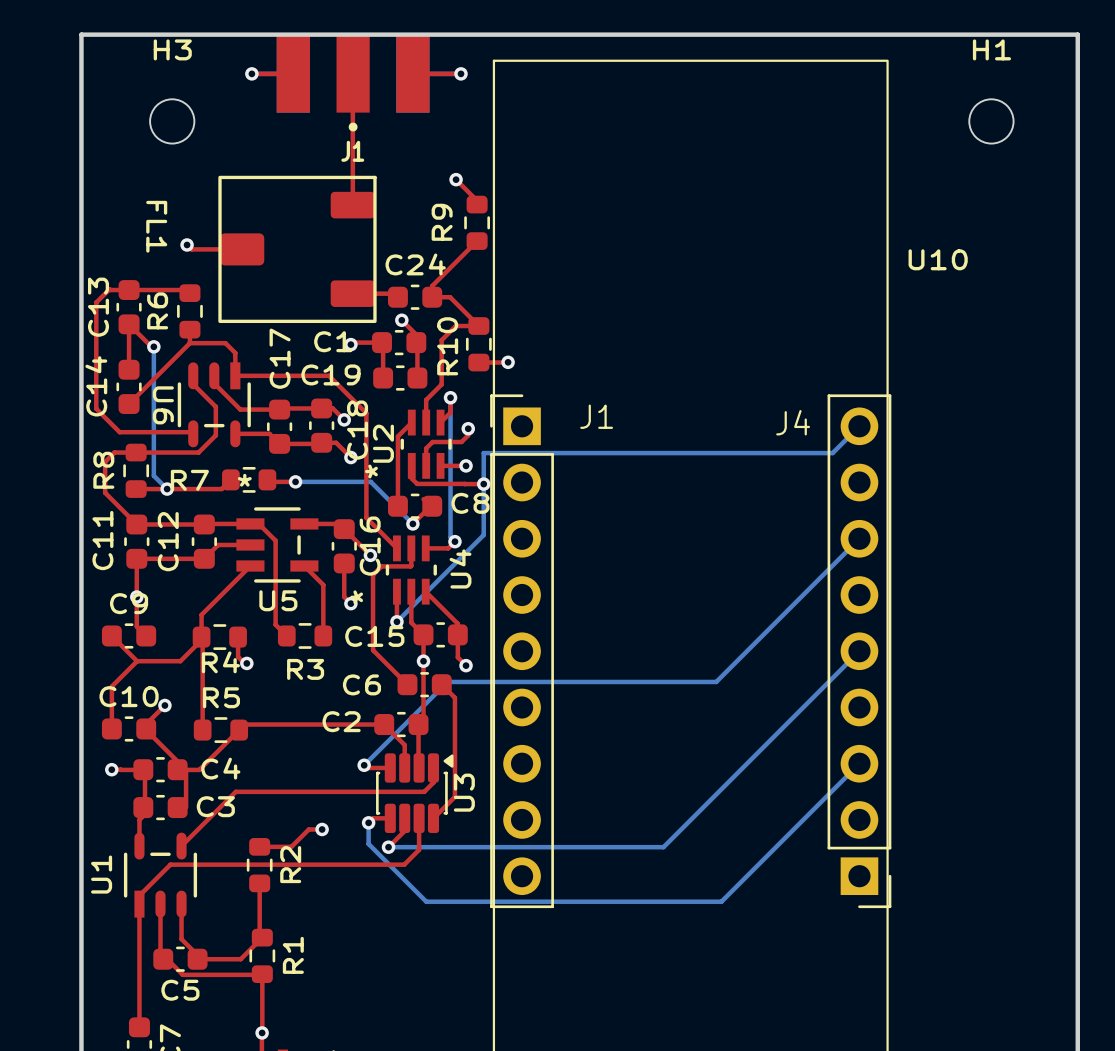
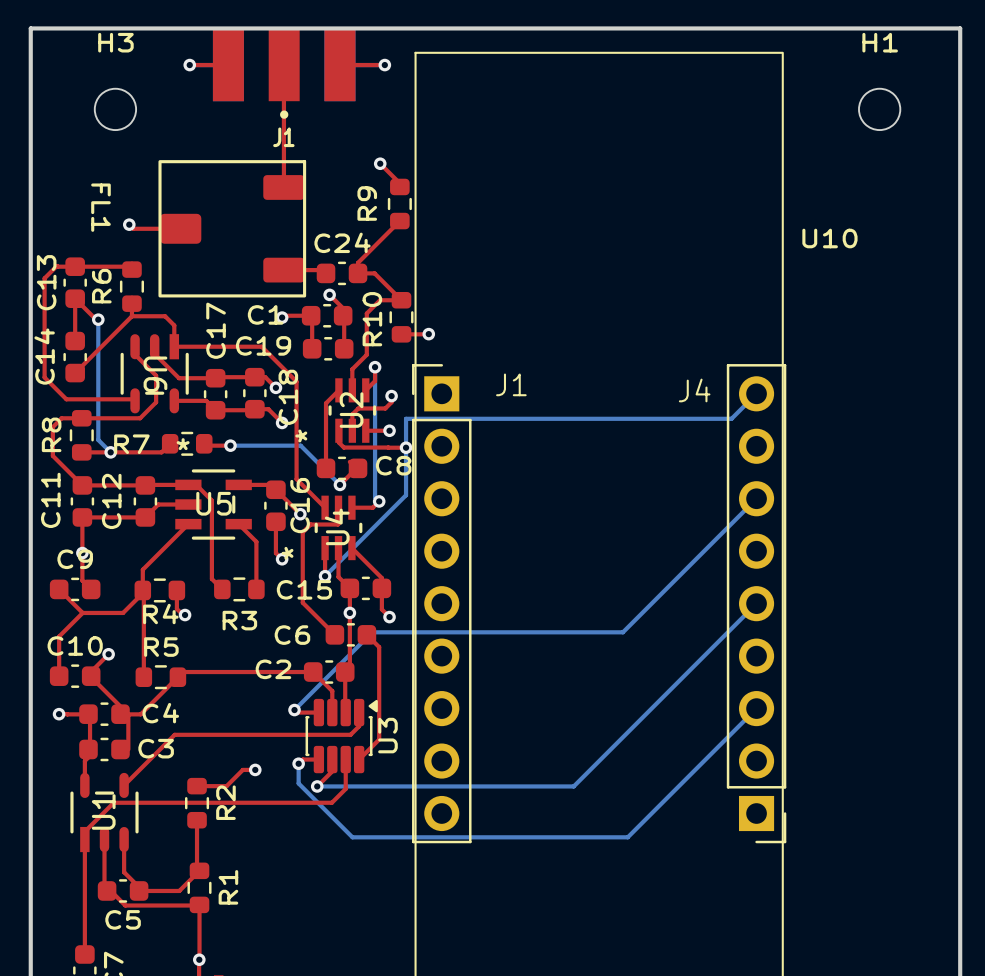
U6 name position: U6 (163, 405) -> U6 (155, 374)
U2 name position: U2 (383, 443) -> U2 (351, 410)
U4 name position: U4 (460, 568) -> U4 (337, 526)
U5 name position: U5 (278, 600) -> U5 (214, 503)
U1 name position: U1 (101, 874) -> U1 (103, 811)

